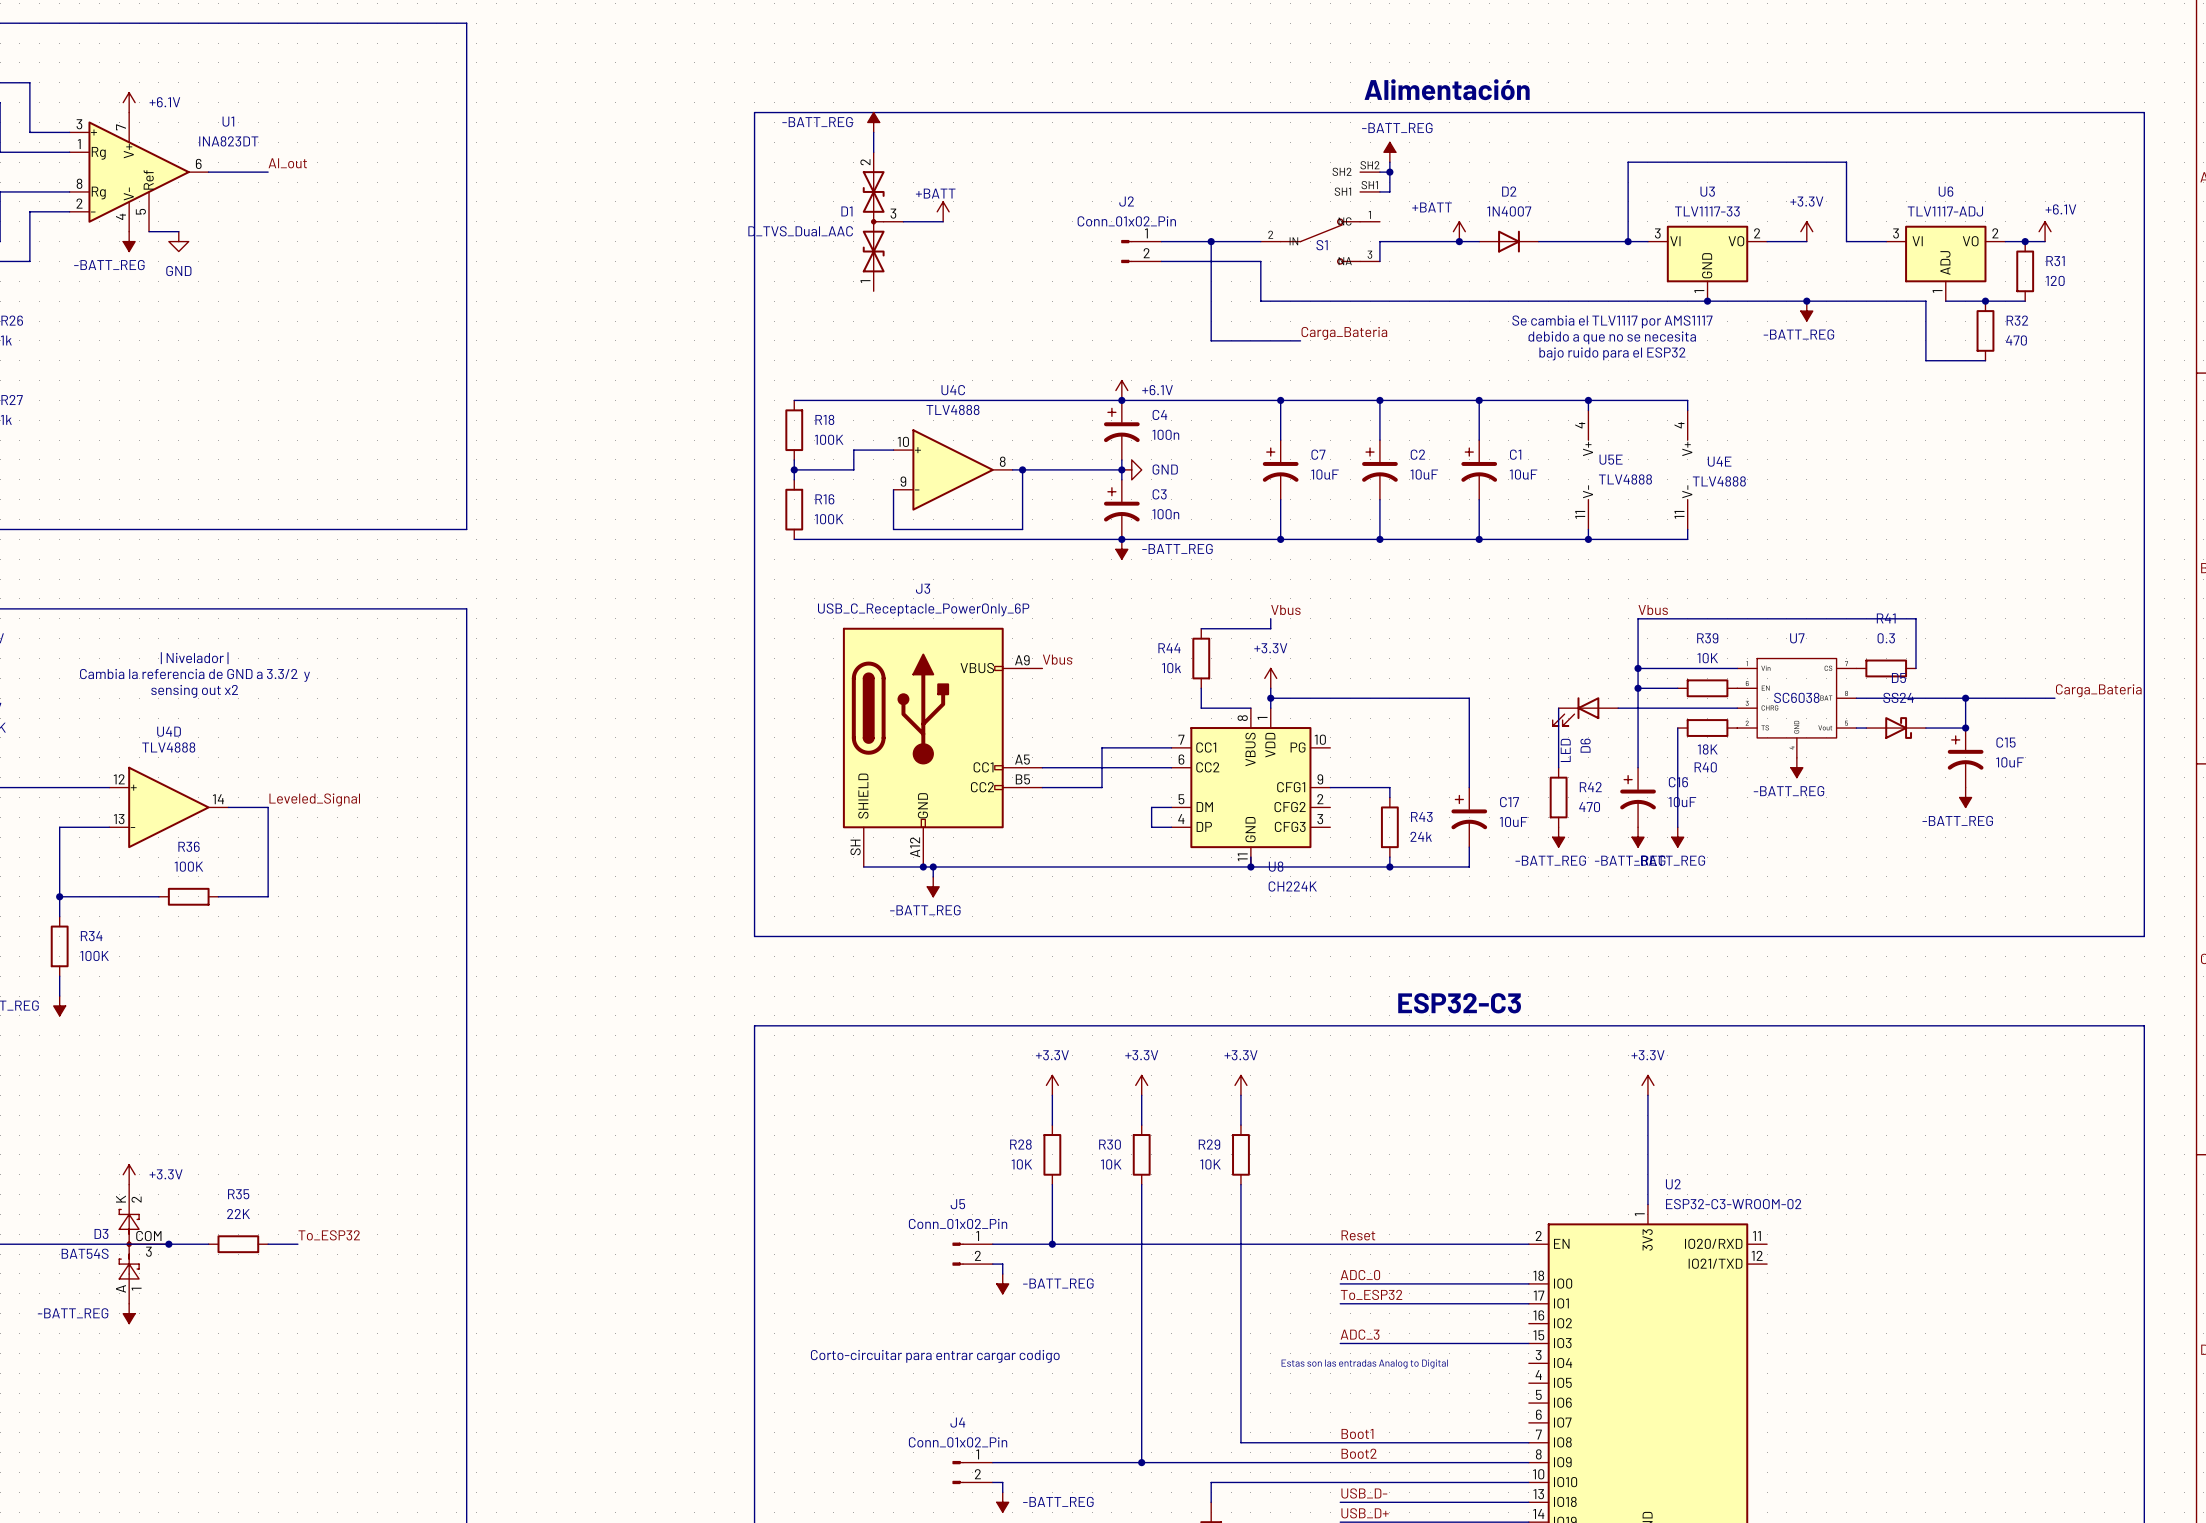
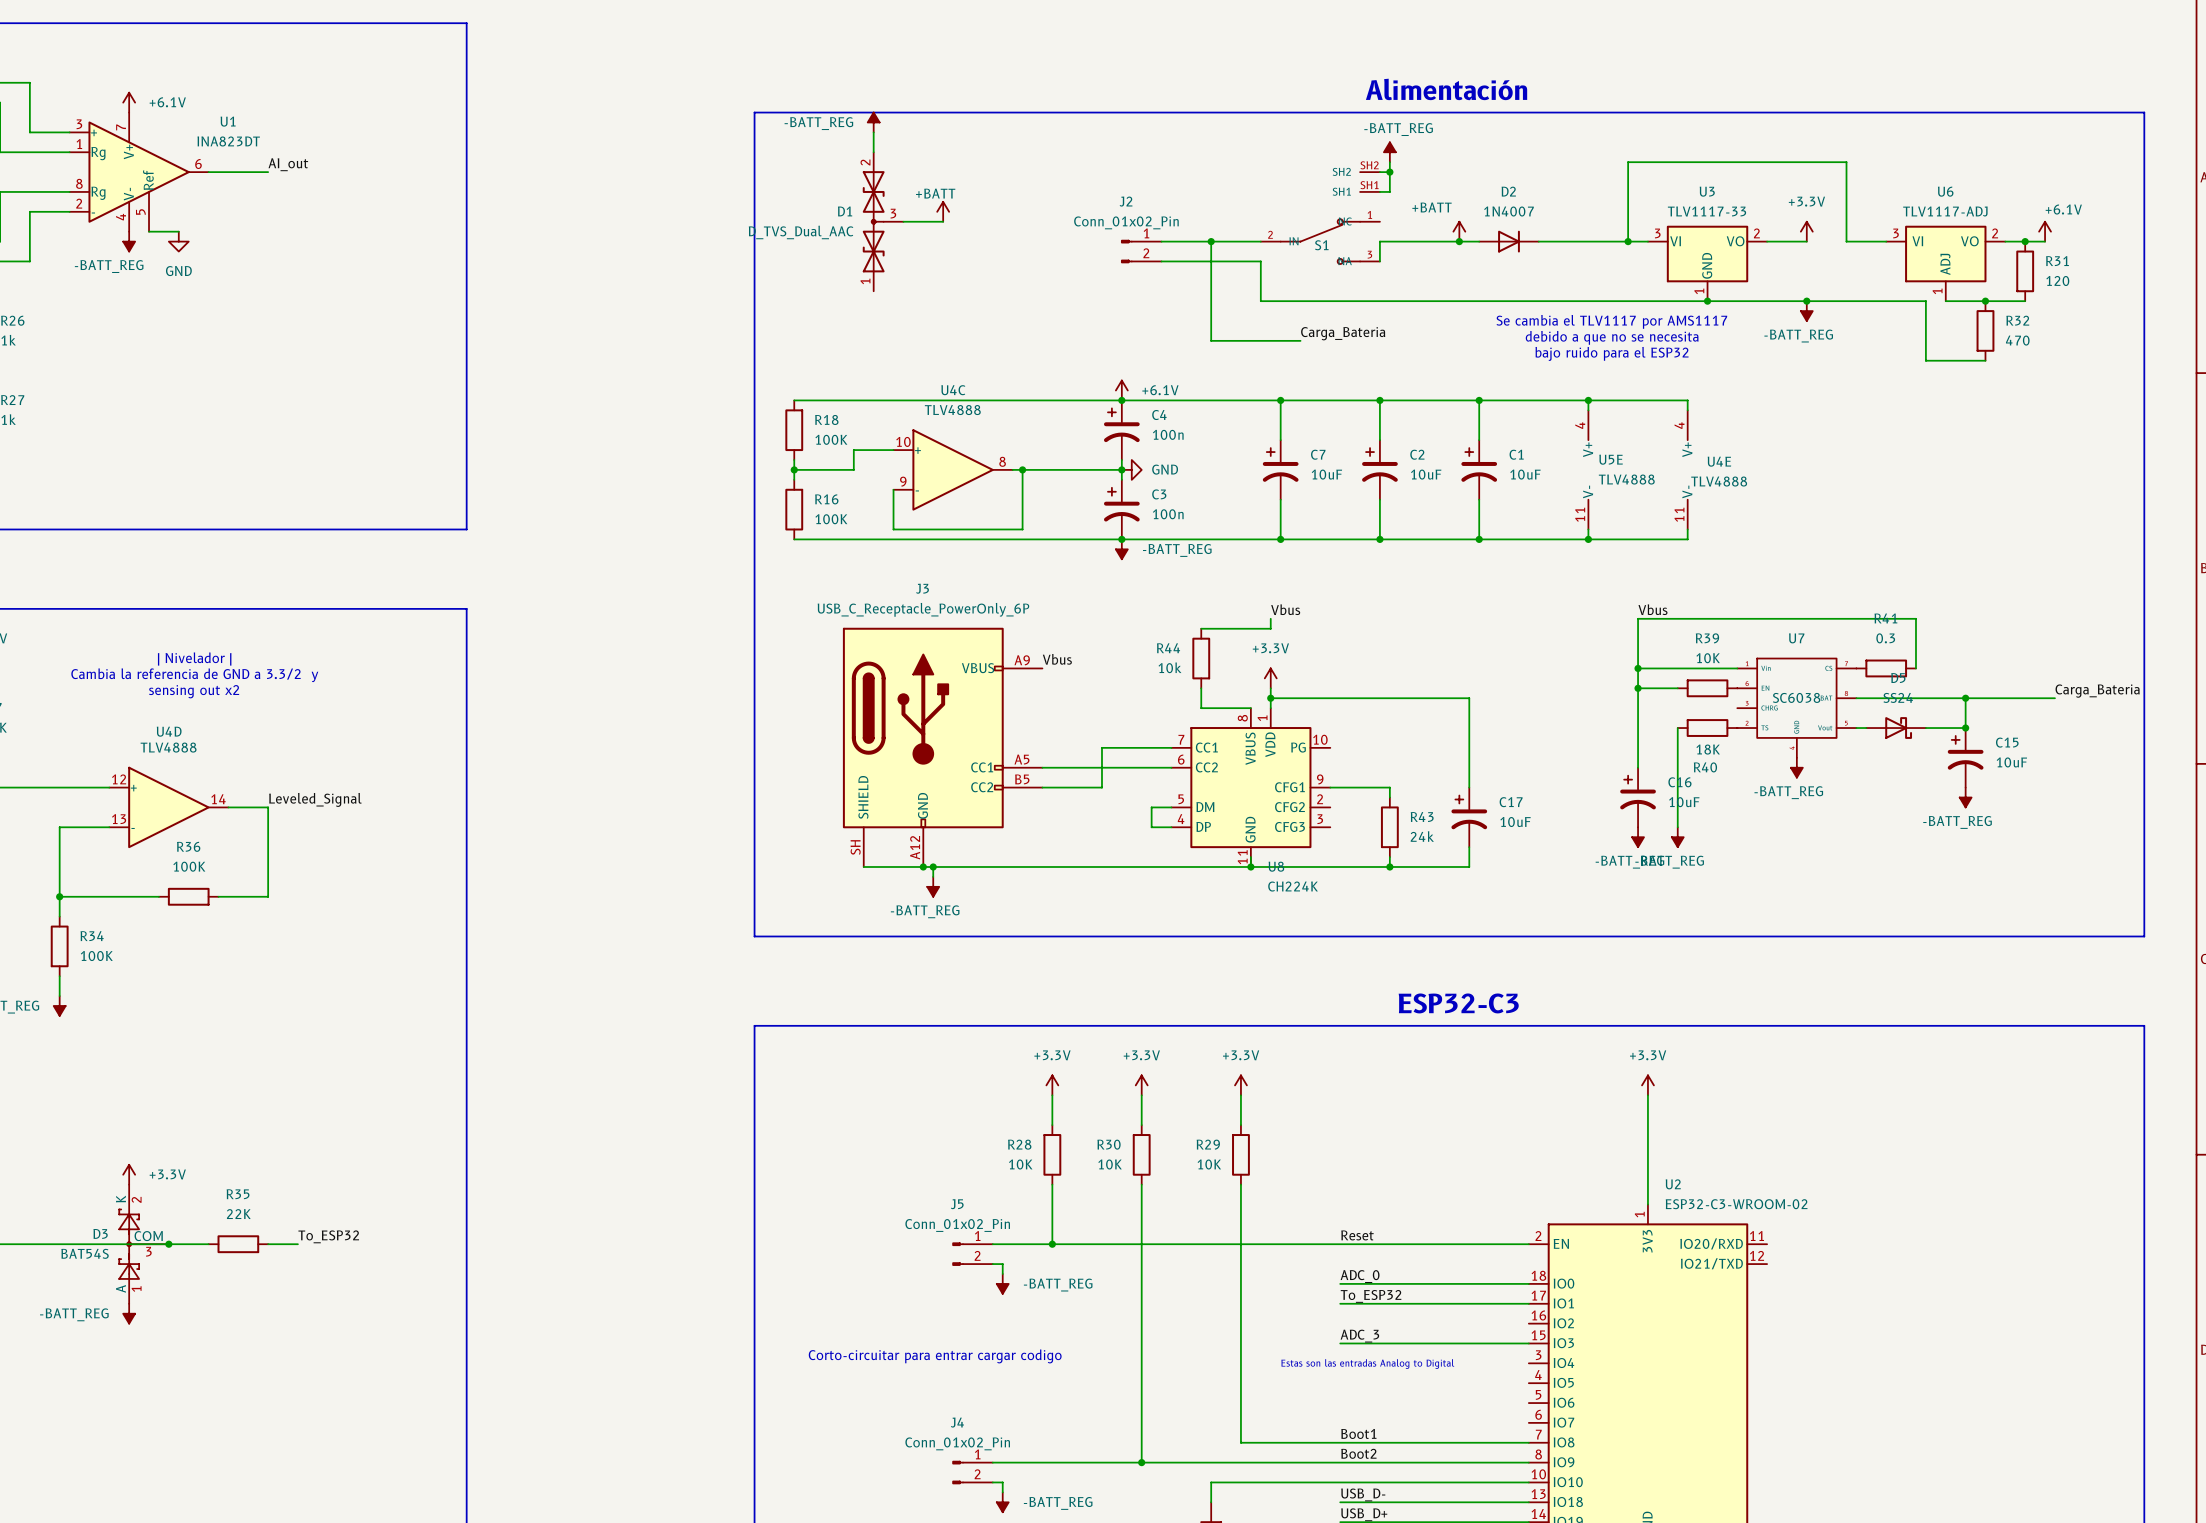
wire: (1558, 708) (1558, 767) -> none
wire: (1618, 708) (1737, 708) -> none
D6: LED (1585, 711) -> none
R42: 470 (1558, 797) -> none
power symbol: -BATT_REG (1558, 837) -> none

